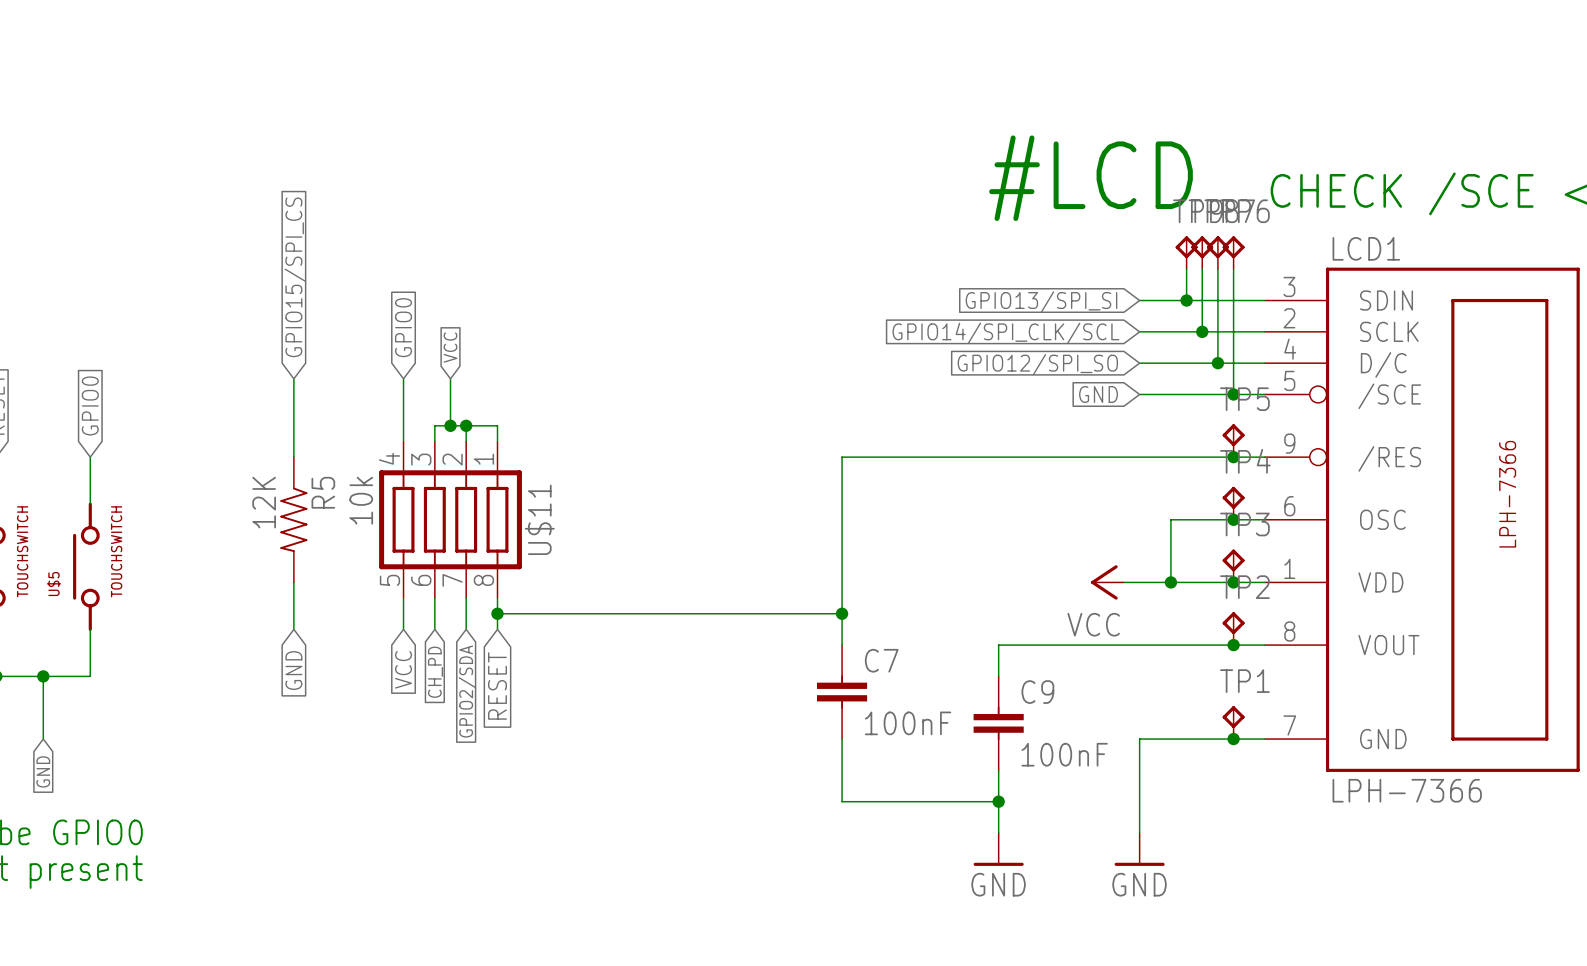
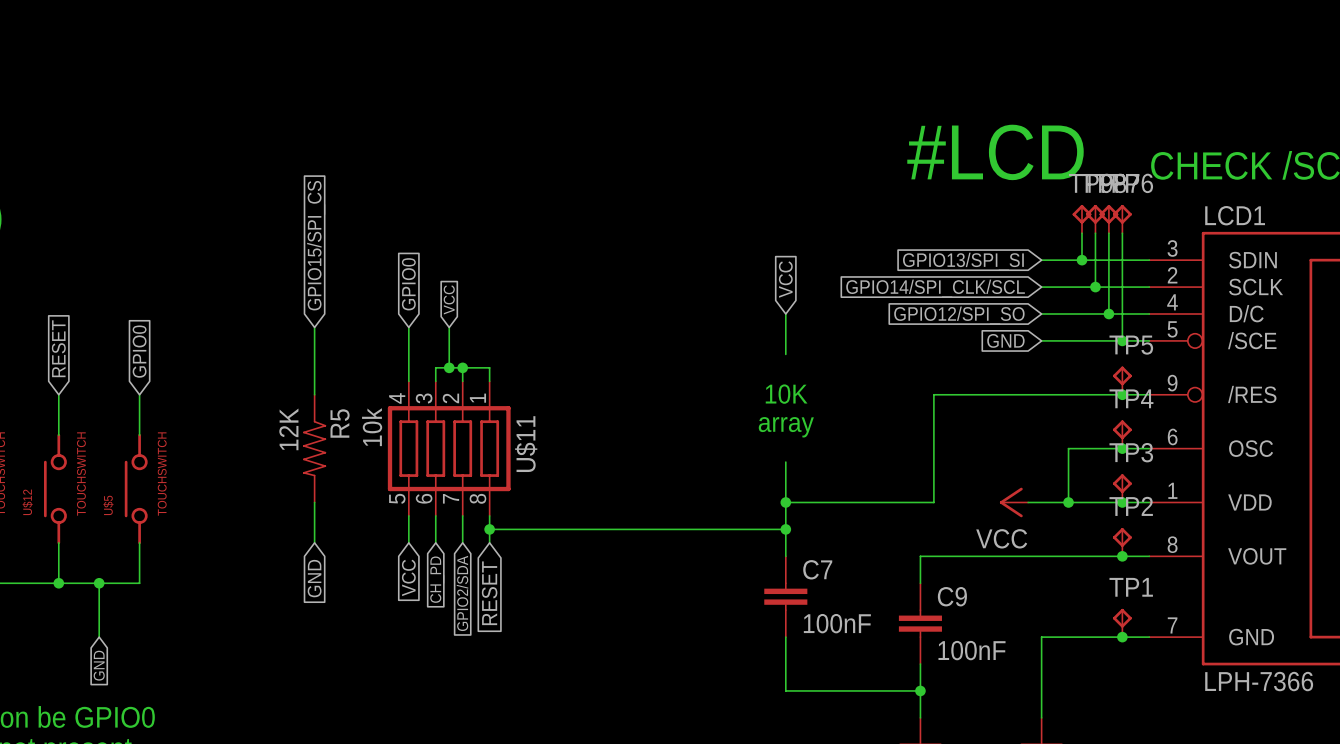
global label: none -> VCC (785, 279)
wire: none -> (785, 314) (785, 354)
text: none -> 10K (786, 394)
wire: (1014, 457) (842, 457) (842, 535) -> (933, 394) (933, 502) (785, 502)
text: none -> array (786, 427)
junction: none -> (785, 502)

